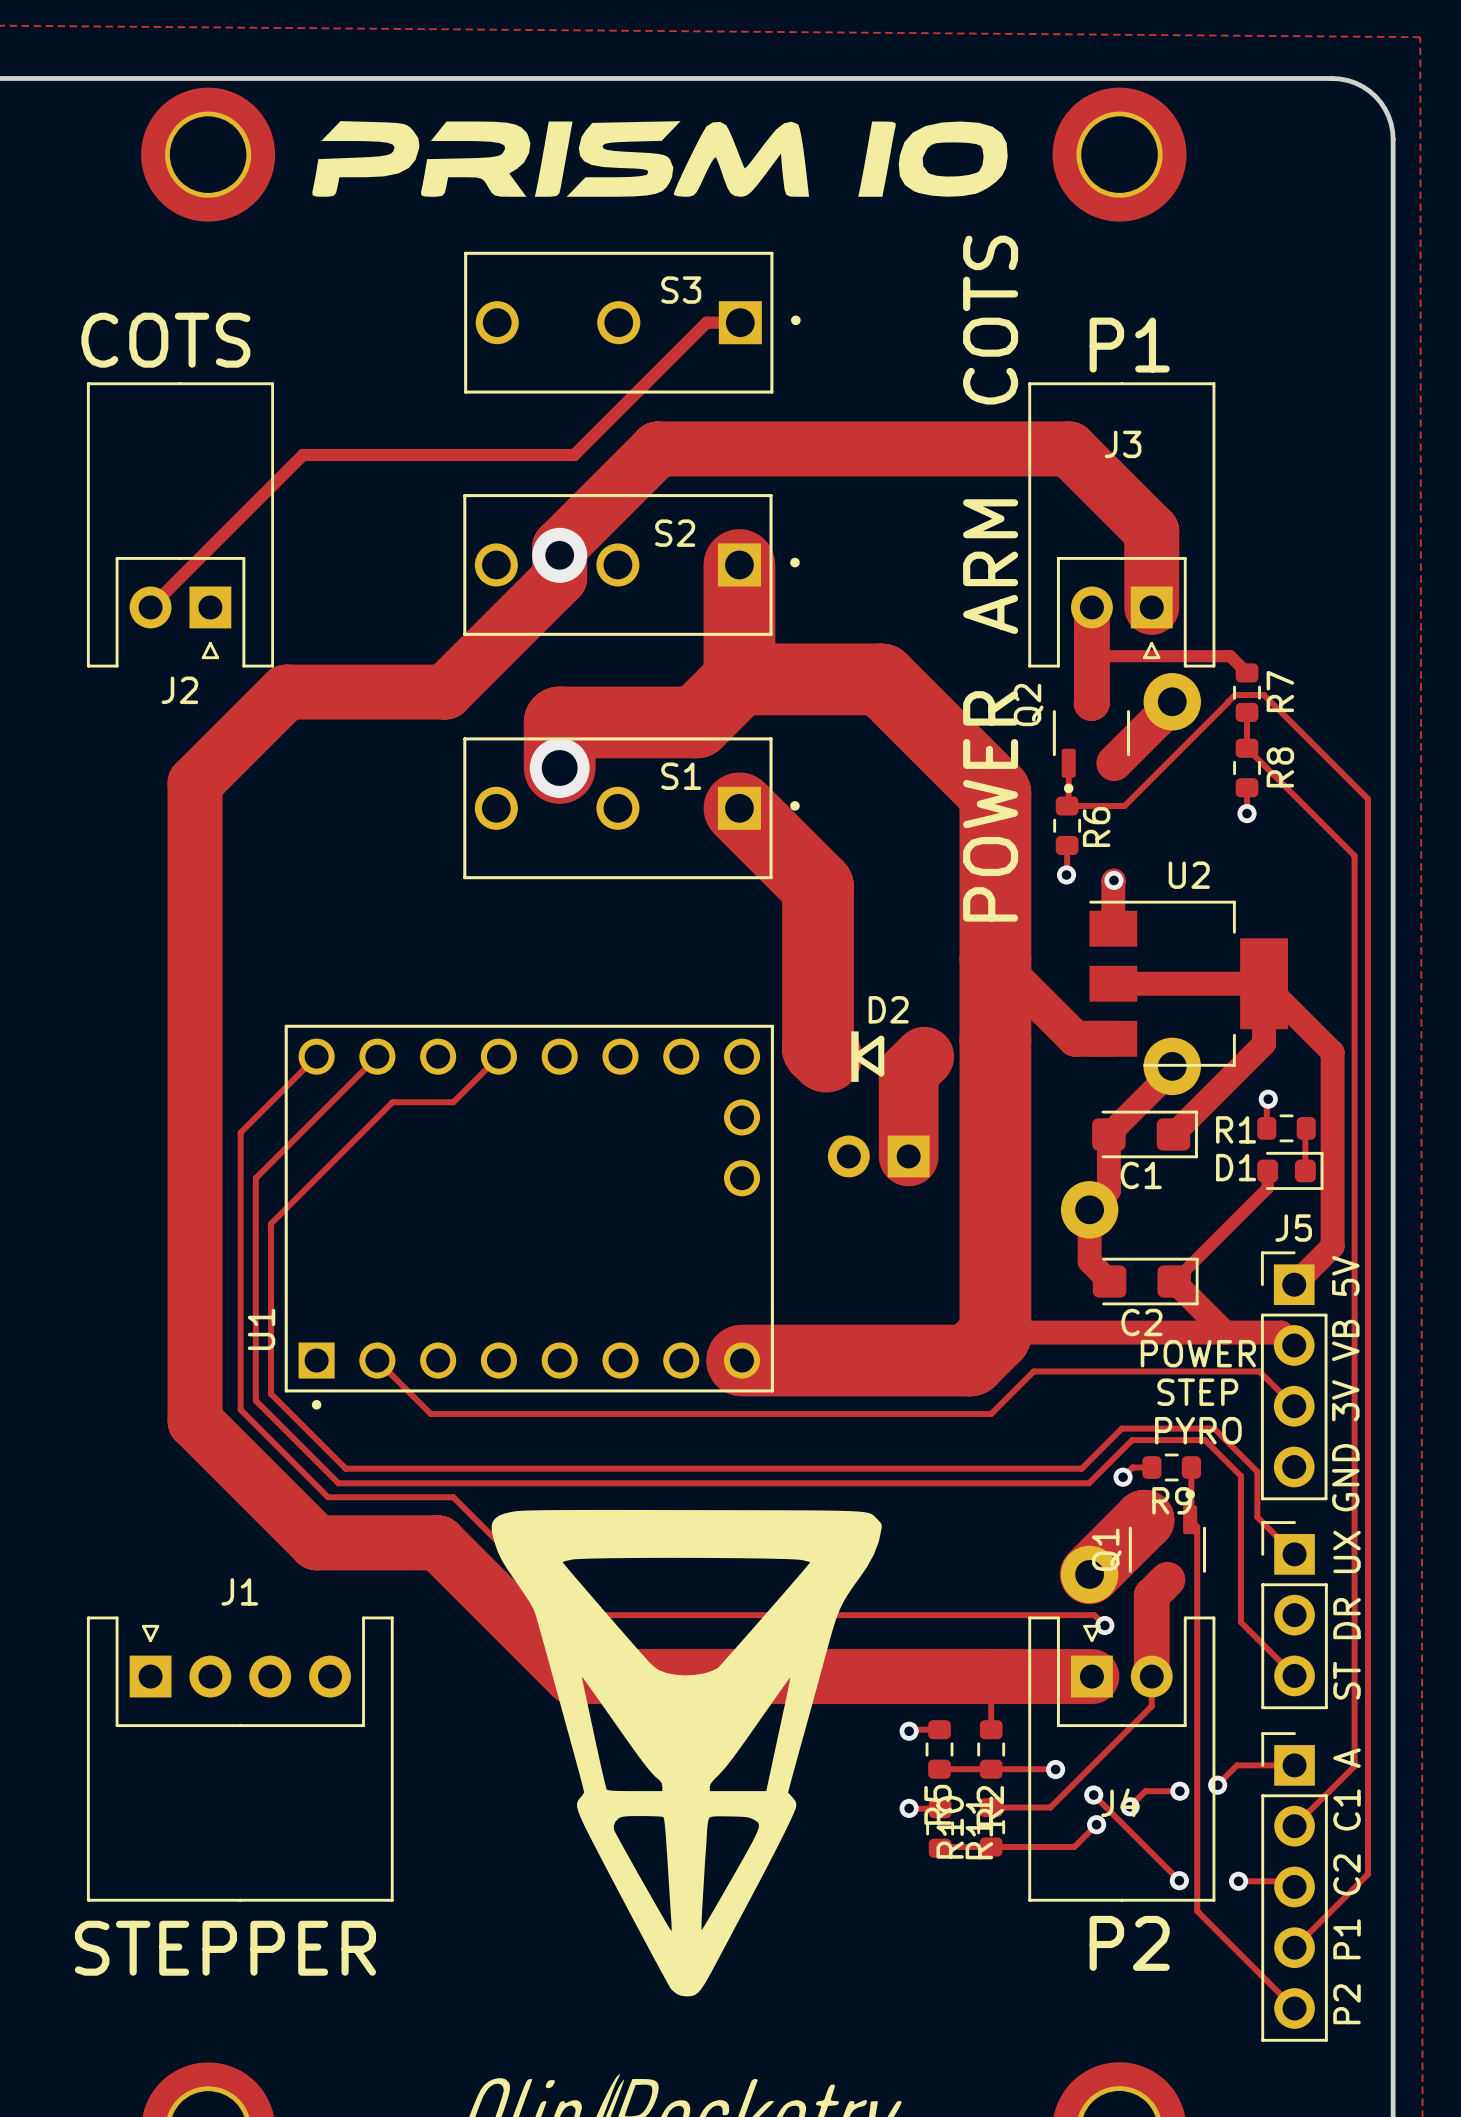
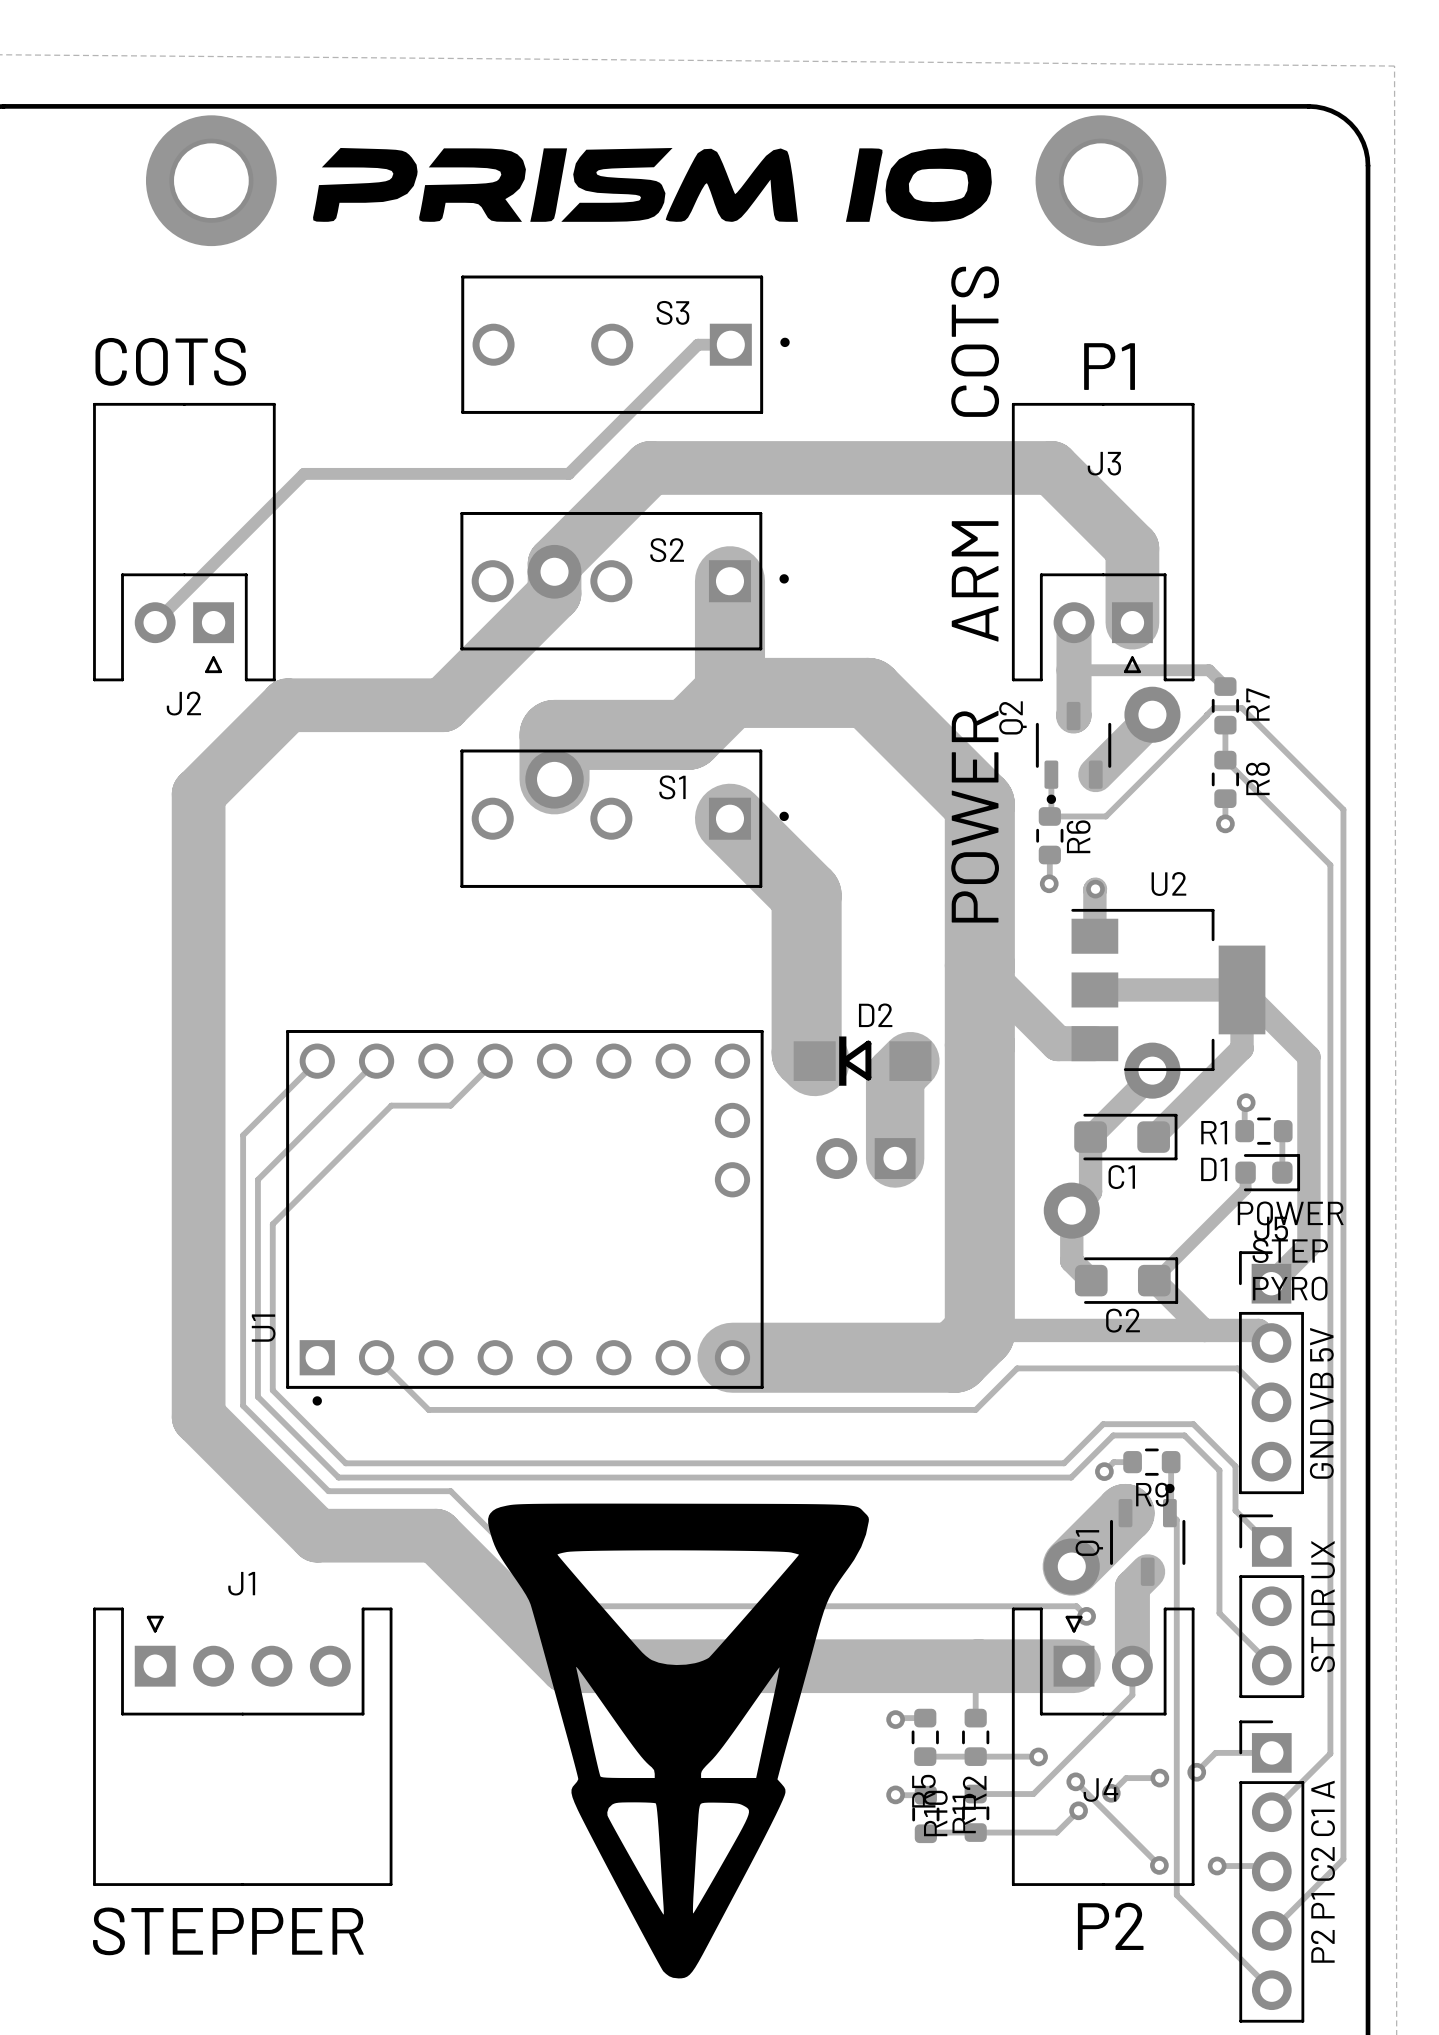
text position: POWER (1198, 1353) -> POWER (1290, 1213)
text: GND 3V VB 5V (1345, 1383) -> GND VB 5V (1321, 1403)
text position: STEP (1197, 1392) -> STEP (1290, 1251)
text position: PYRO (1198, 1430) -> PYRO (1290, 1288)

